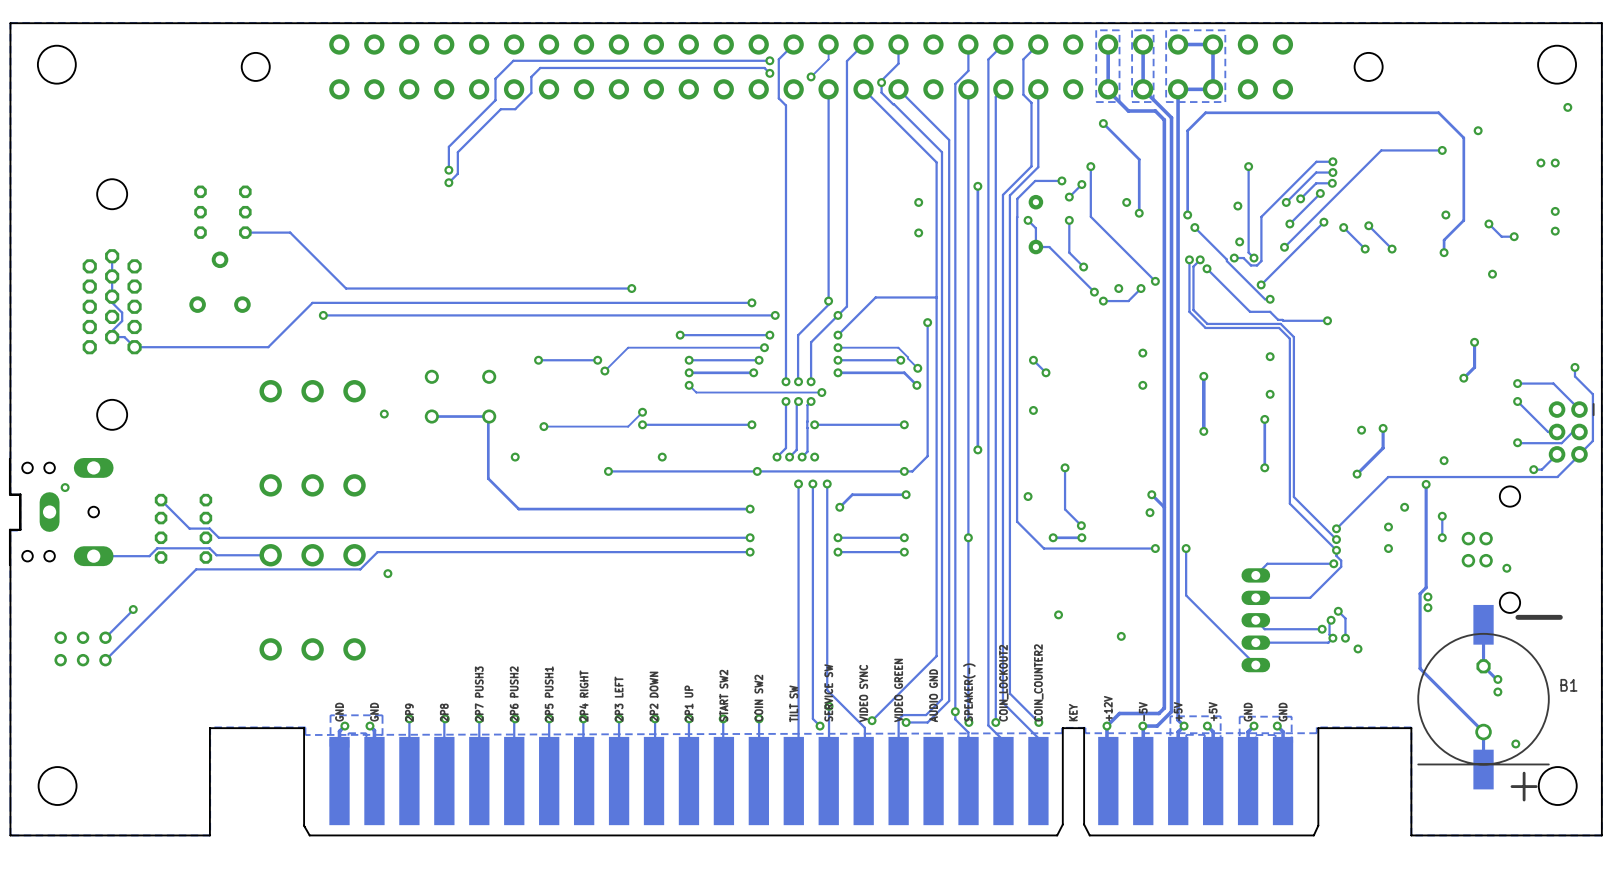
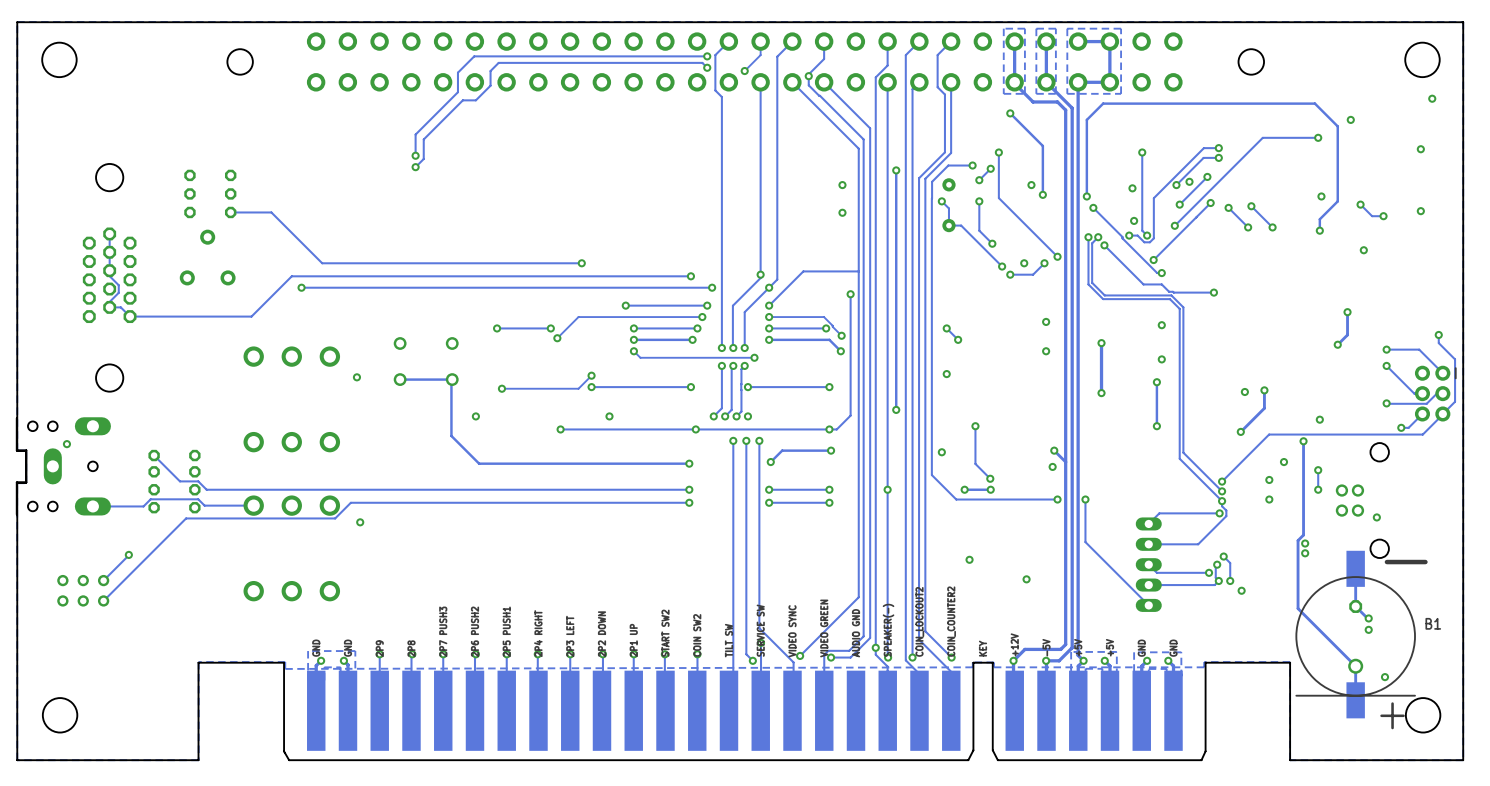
via: (1540, 163) -> none
track: (1332, 183) (1316, 183) (1300, 198) -> none
via: (1332, 183) -> none
via: (1555, 211) -> none

